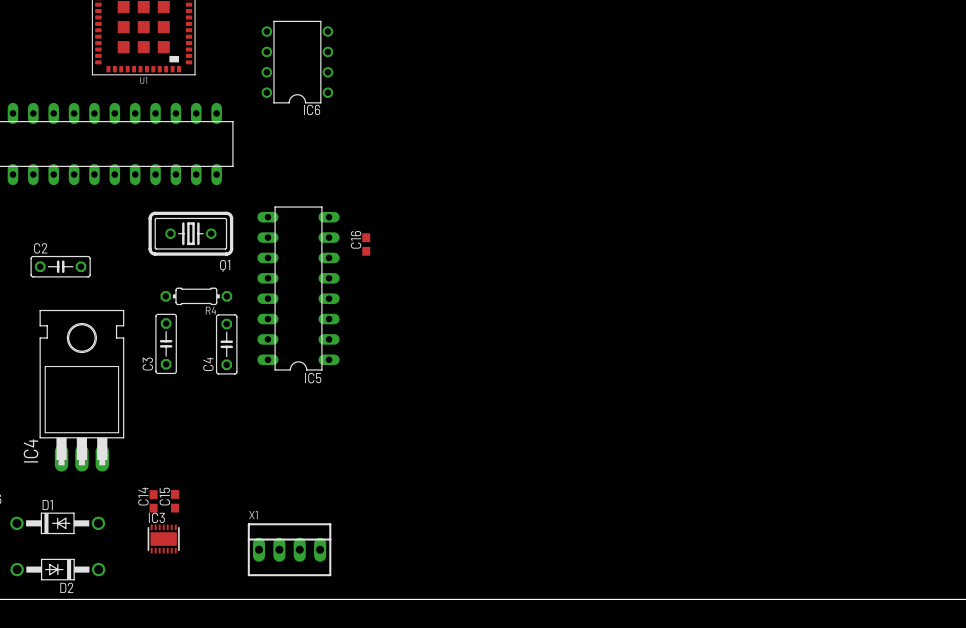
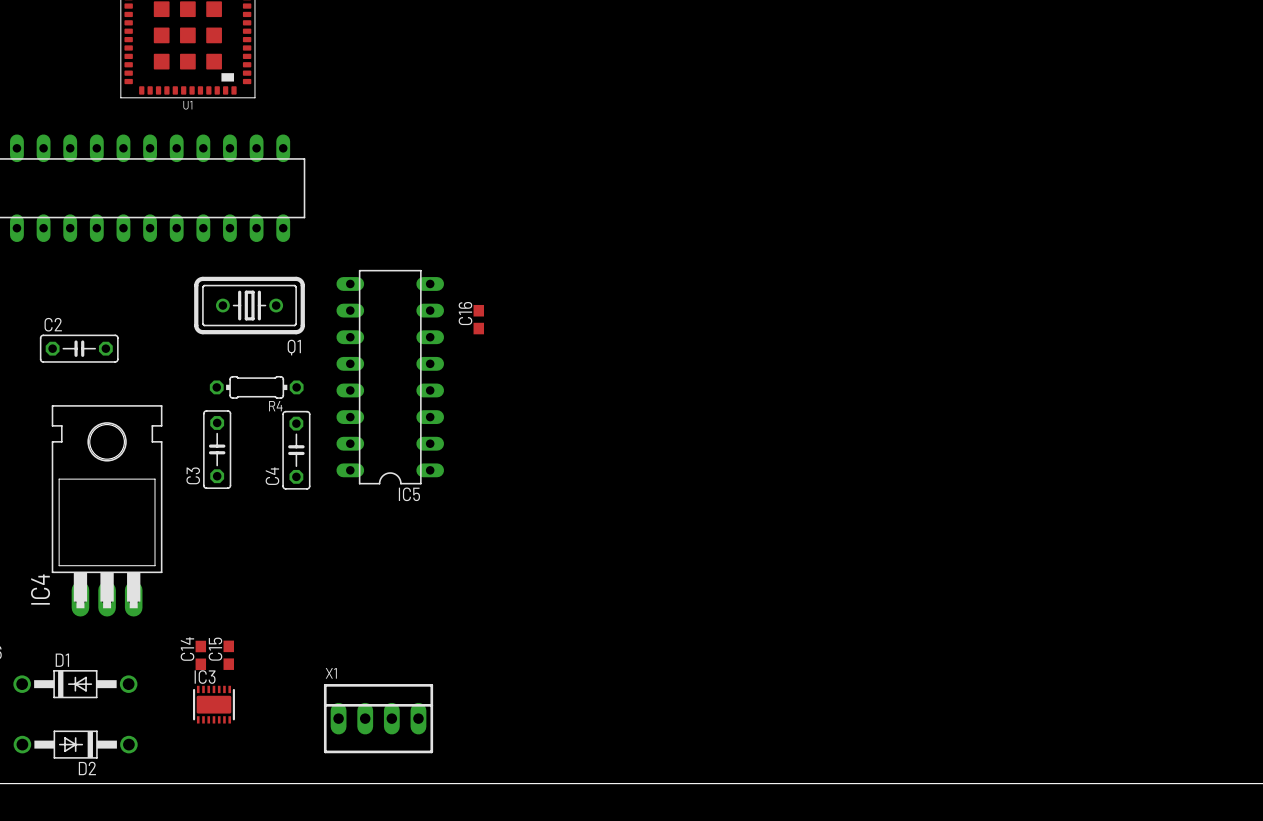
IC6: (297, 62) -> none

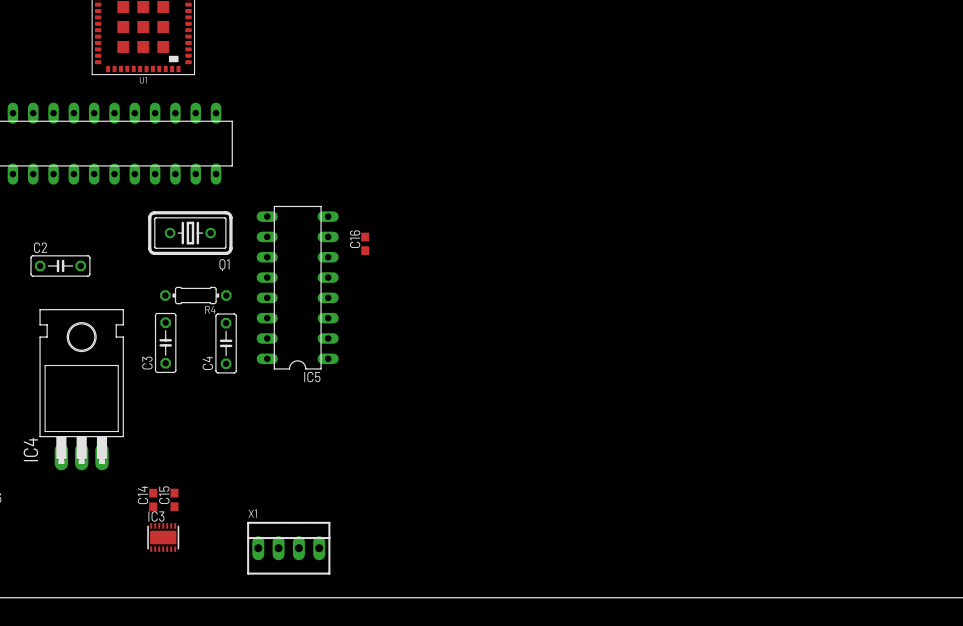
D1: (75, 684) -> none
D2: (75, 744) -> none

